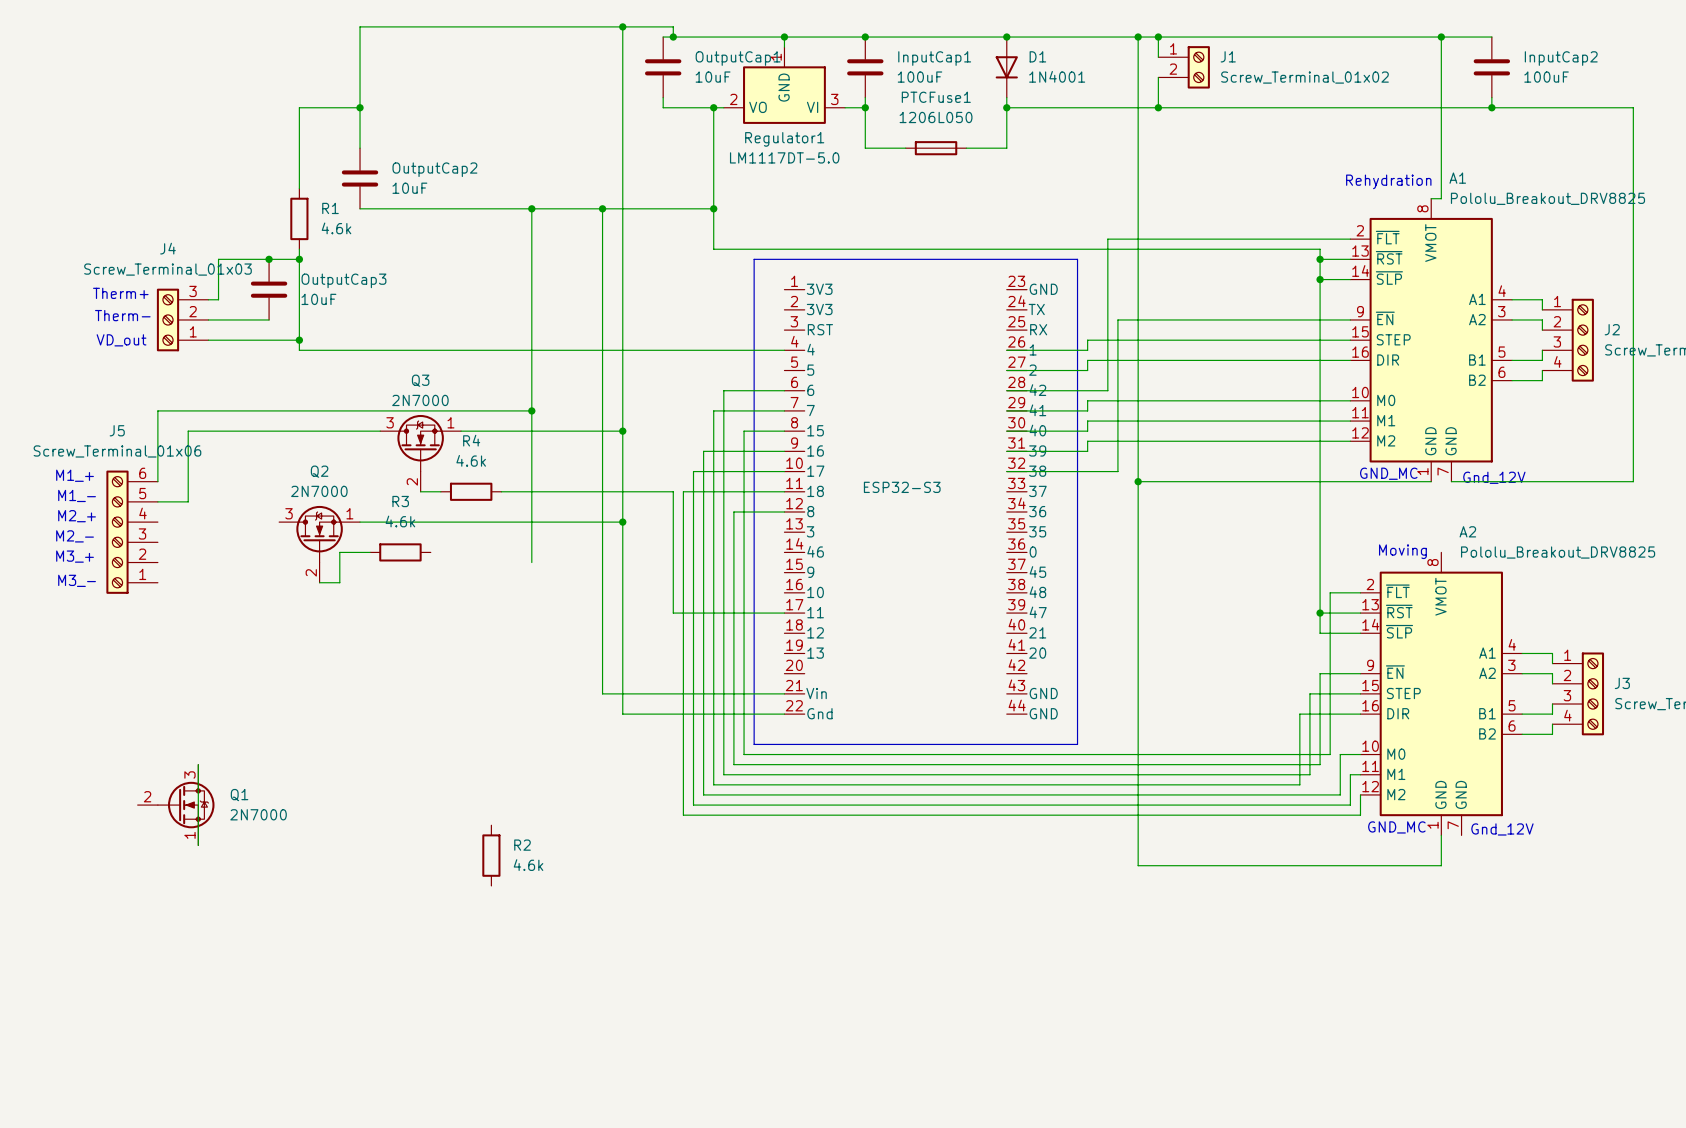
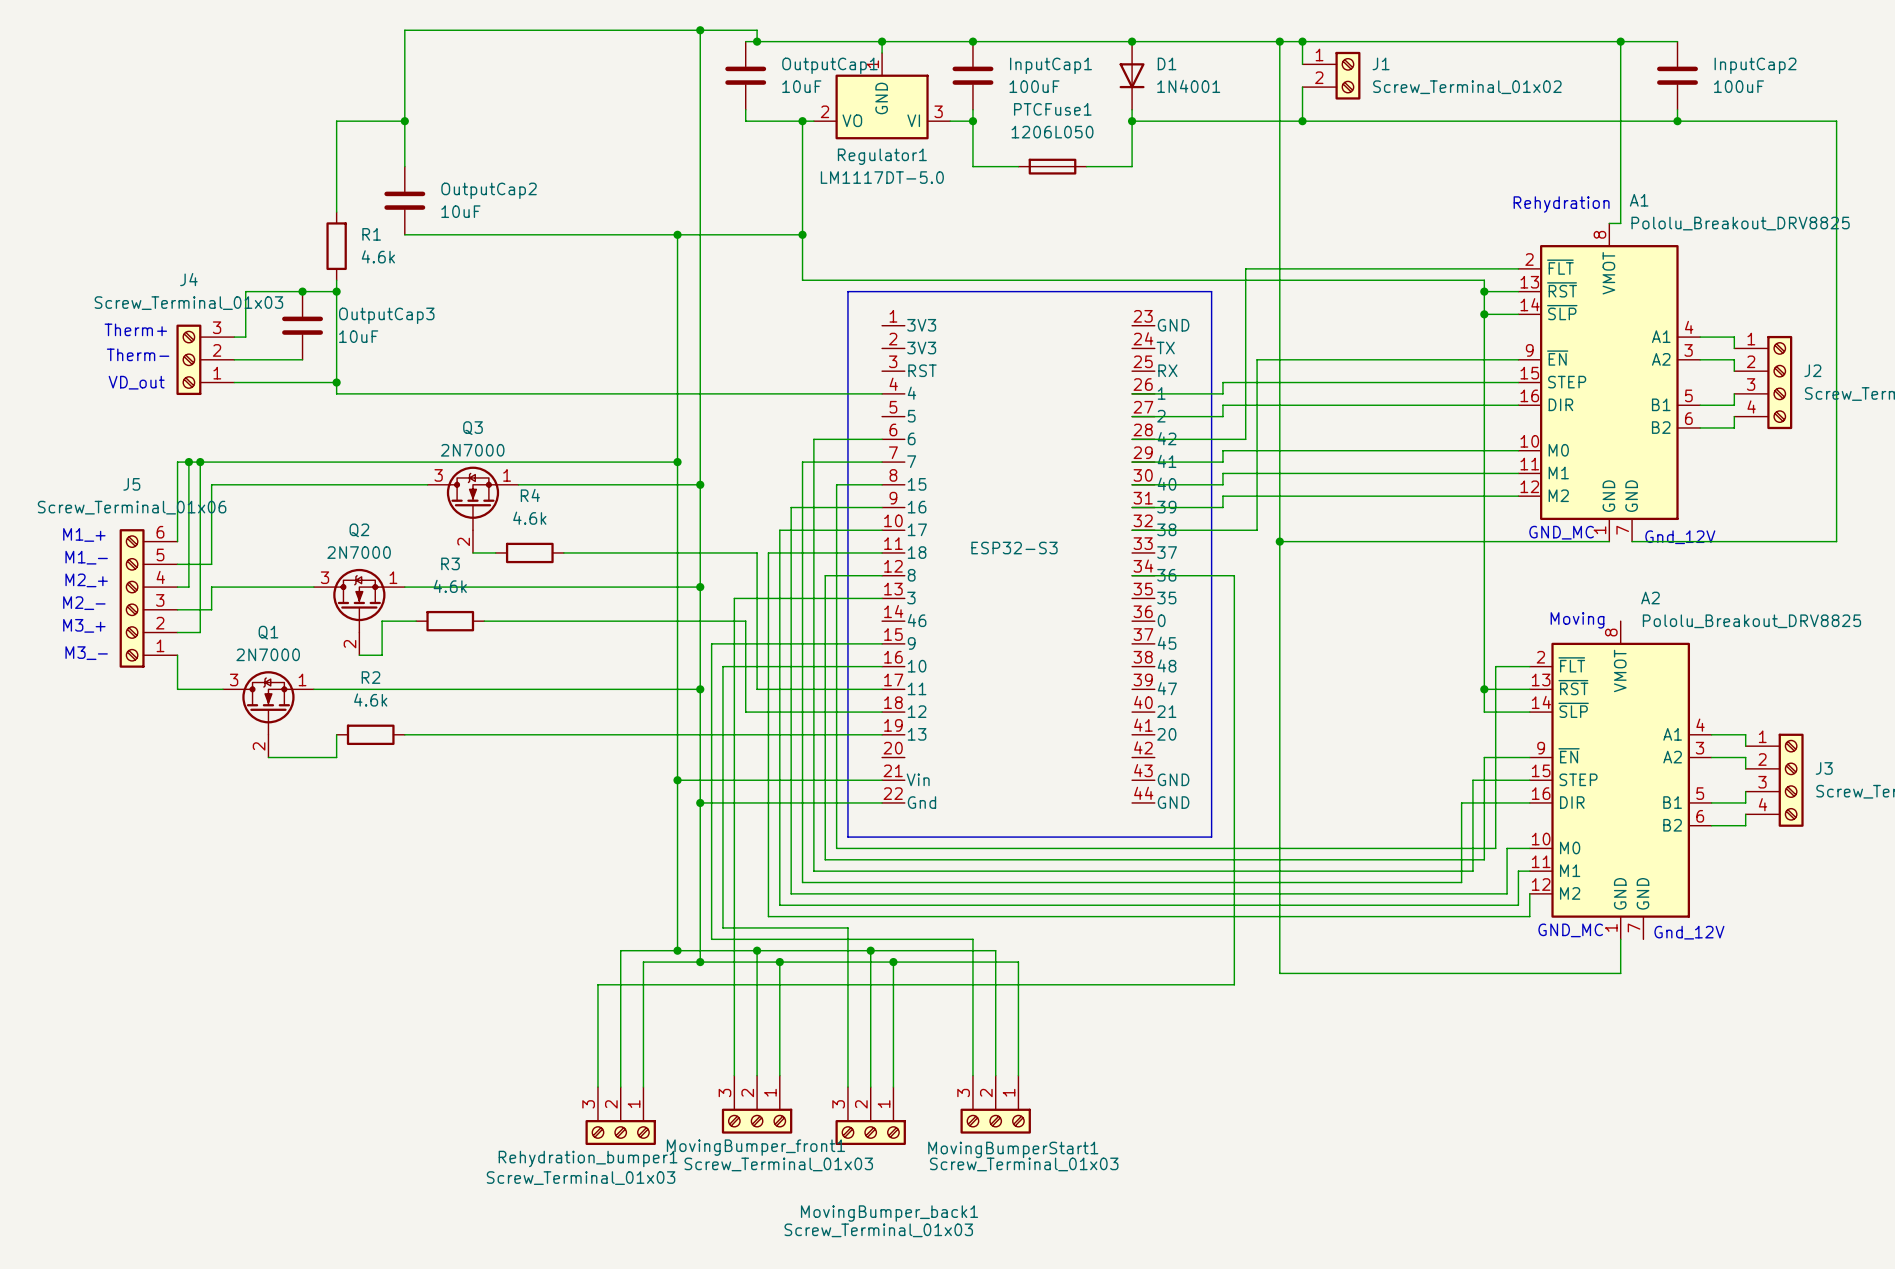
wire: (531, 208) (531, 562) -> none
junction: (531, 208) -> none
wire: none -> (188, 462) (188, 587) (177, 587)
junction: none -> (188, 462)
wire: none -> (200, 462) (200, 632) (177, 632)
junction: none -> (200, 462)
wire: none -> (597, 462) (677, 462)
junction: (531, 410) -> none
junction: none -> (677, 462)
wire: none -> (1132, 575) (1234, 575) (1234, 984) (597, 984) (597, 1087)
wire: none -> (313, 587) (211, 587) (211, 609) (177, 609)
wire: none -> (882, 598) (734, 598) (734, 1075)
wire: none -> (484, 621) (745, 621) (745, 712) (882, 712)
wire: none -> (882, 643) (711, 643) (711, 939) (972, 939) (972, 1075)
wire: none -> (177, 655) (177, 689) (222, 689)
wire: none -> (882, 666) (722, 666) (722, 927) (847, 927) (847, 1087)
wire: none -> (313, 689) (700, 689)
junction: none -> (700, 689)
wire: none -> (336, 734) (336, 757) (268, 757)
wire: none -> (404, 734) (882, 734)
wire: none -> (677, 780) (677, 950)
junction: none -> (677, 780)
wire: none -> (700, 802) (700, 962)
junction: none -> (700, 802)
wire: (198, 764) (198, 845) -> none
Q1 position: (176, 805) -> (268, 714)
Q1 rotation: 0° (186, 805) -> 90° counterclockwise (268, 702)
Q1 value position: 2N7000 (258, 814) -> 2N7000 (268, 654)
R2 name position: R2 (522, 845) -> R2 (370, 677)
junction: none -> (677, 950)
wire: none -> (757, 950) (757, 1075)
junction: none -> (757, 950)
wire: none -> (870, 950) (870, 1087)
junction: none -> (870, 950)
R2 rotation: 0° (491, 855) -> 90° clockwise (370, 734)
R2 position: (491, 855) -> (370, 734)
junction: none -> (700, 962)
wire: none -> (779, 962) (779, 1075)
junction: none -> (779, 962)
wire: none -> (893, 962) (893, 1087)
junction: none -> (893, 962)
R2 value position: 4.6k (528, 865) -> 4.6k (370, 700)
wire: none -> (995, 1075) (995, 950) (620, 950) (620, 1087)
wire: none -> (1018, 1075) (1018, 962) (643, 962) (643, 1087)
MovingBumper_front1: none -> Screw_Terminal_01x03 (757, 1104)
MovingBumperStart1: none -> Screw_Terminal_01x03 (995, 1104)
Rehydration_bumper1: none -> Screw_Terminal_01x03 (620, 1116)
MovingBumper_back1: none -> Screw_Terminal_01x03 (870, 1116)

